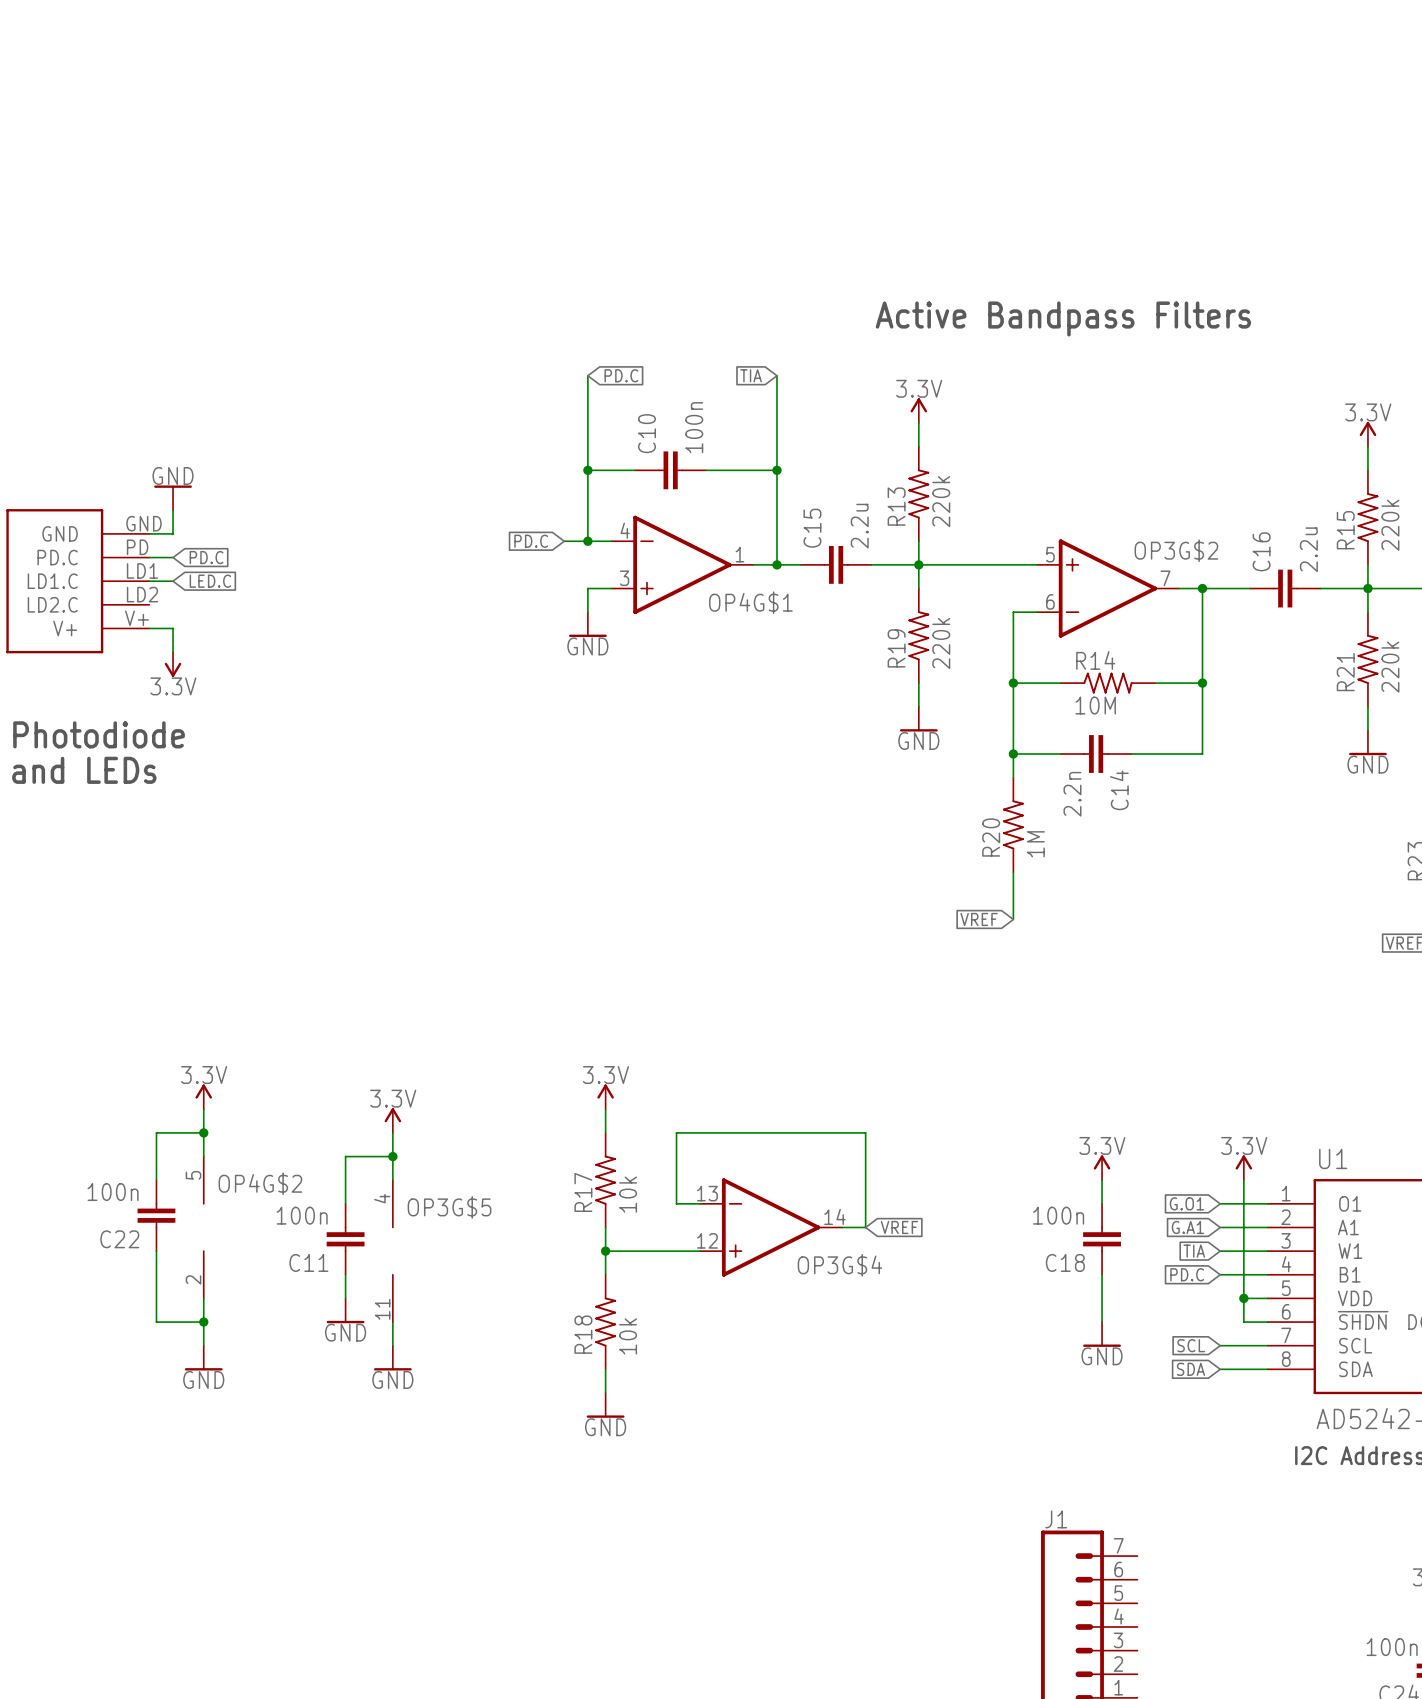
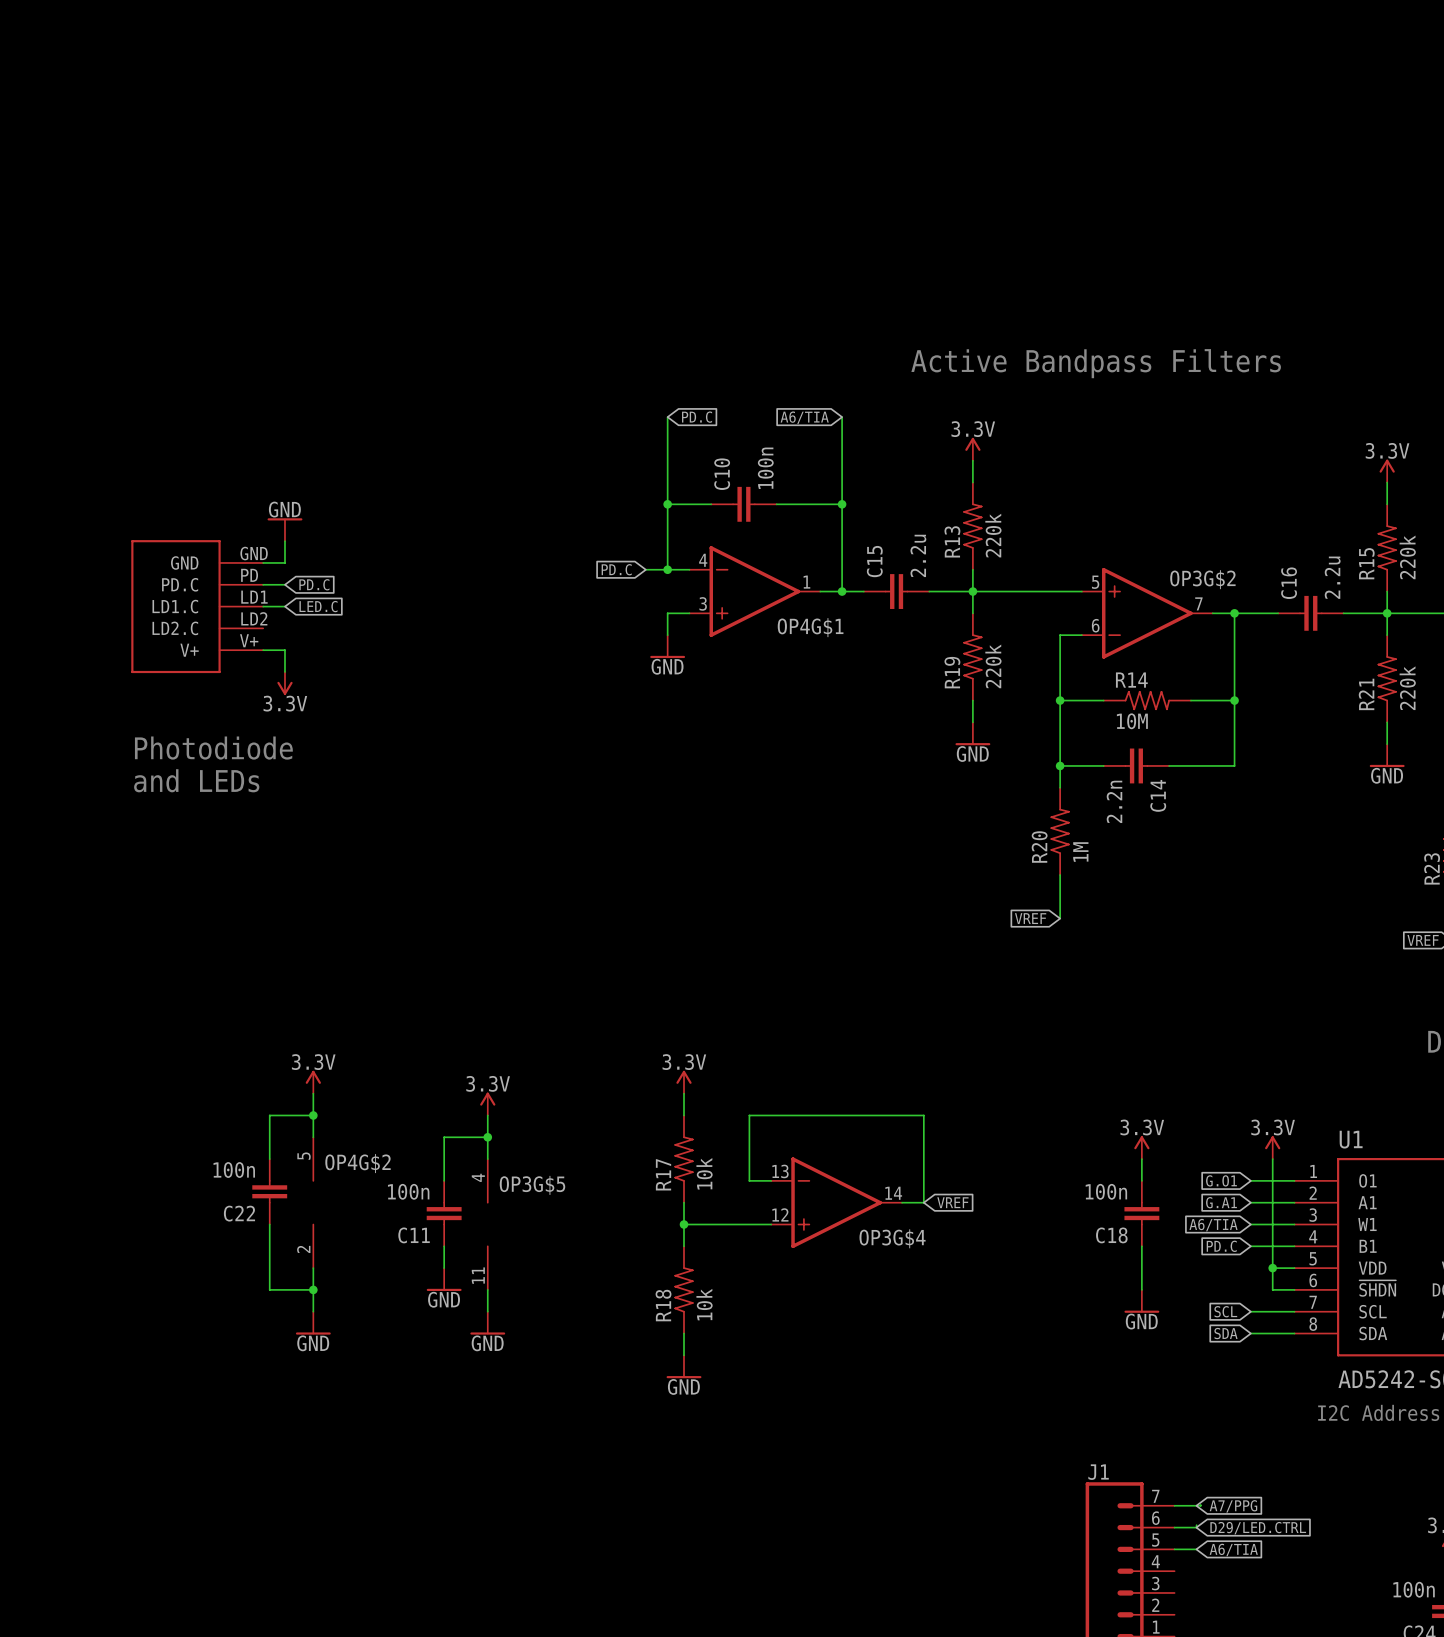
global label: TIA (751, 375) -> A6/TIA (804, 417)
global label: TIA (1194, 1251) -> A6/TIA (1213, 1225)
wire: none -> (1200, 1504) (1174, 1505)
global label: none -> A7/PPG (1233, 1506)
wire: none -> (1196, 1525) (1196, 1527) (1174, 1527)
global label: none -> D29/LED.CTRL (1258, 1528)
wire: none -> (1174, 1549) (1196, 1549)
global label: none -> A6/TIA (1233, 1549)

